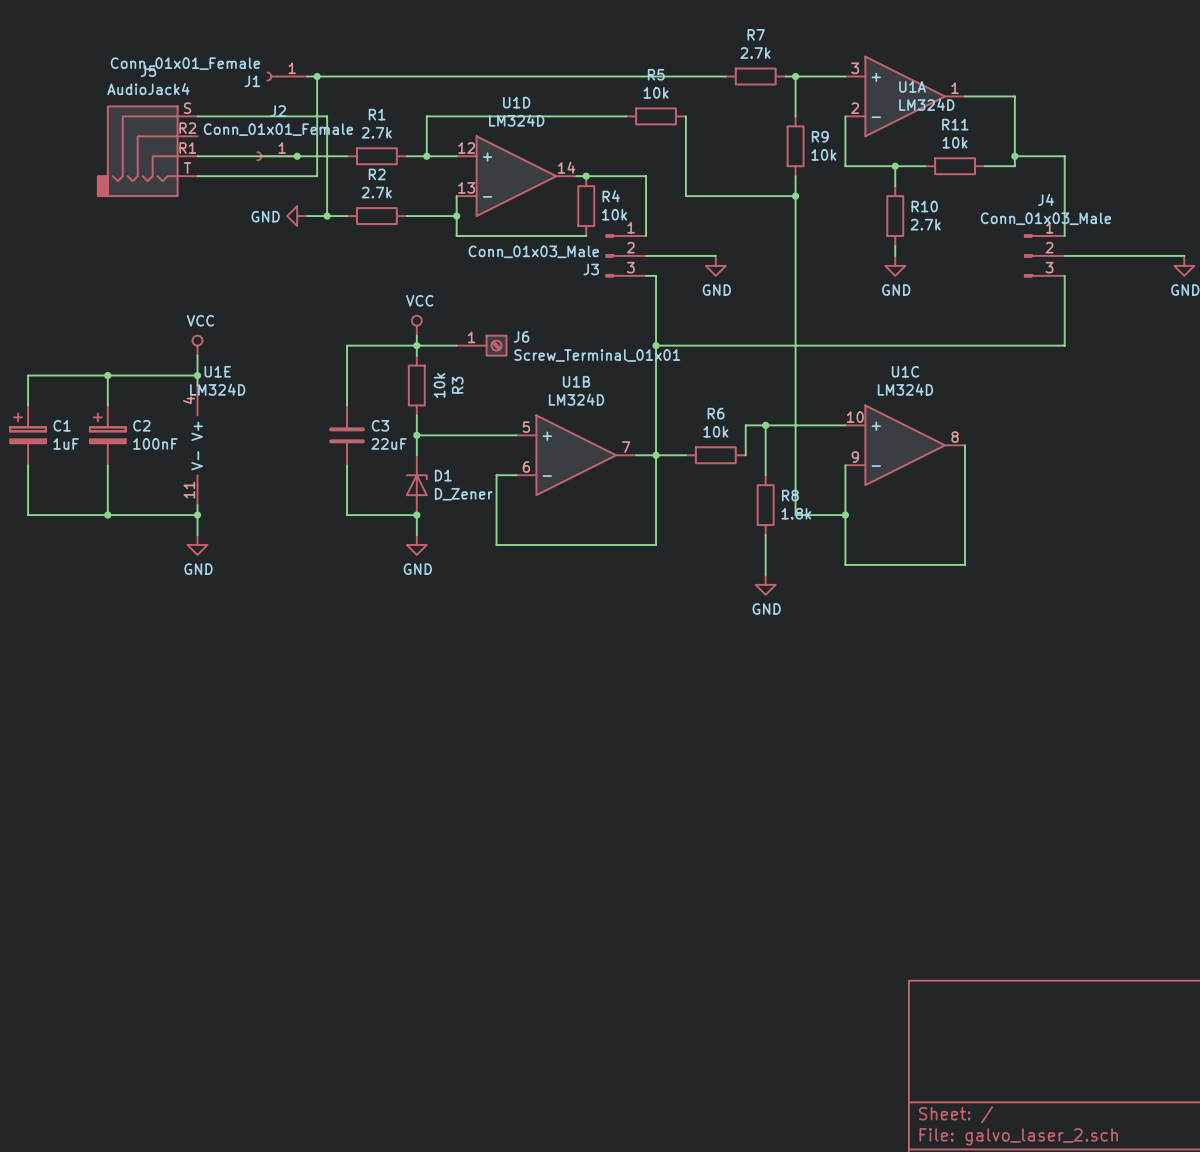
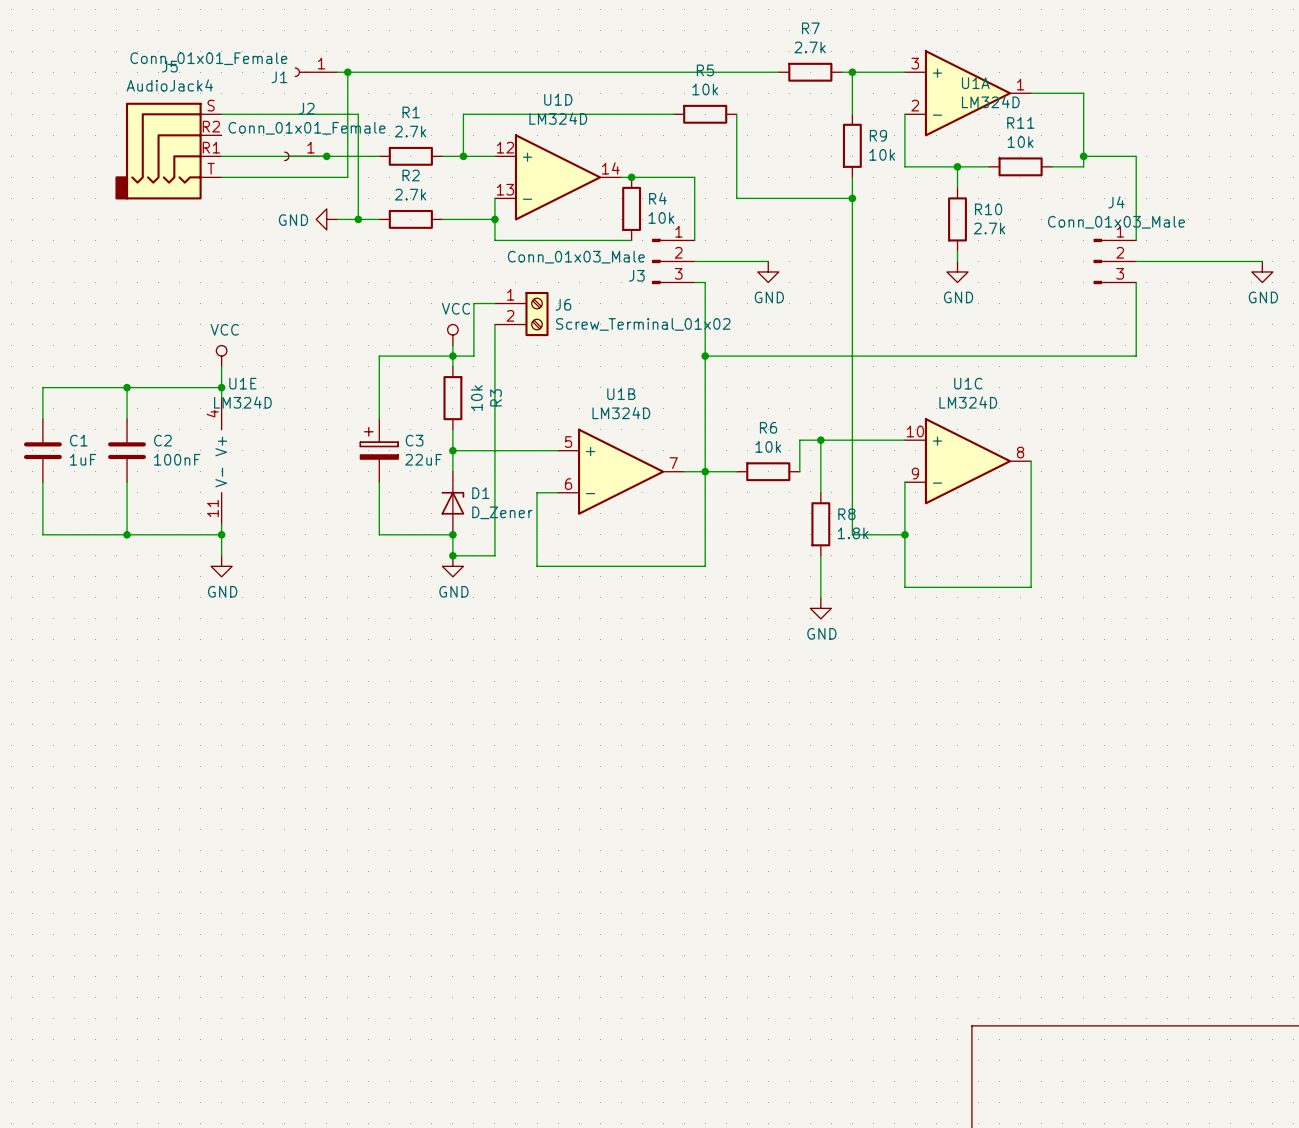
wire: none -> (494, 324) (494, 555) (452, 555)
J6 symbol: [456, 334, 508, 357] -> [494, 291, 549, 337]
wire: (436, 345) (456, 345) -> (473, 356) (473, 303) (494, 303)
J6 value: Screw_Terminal_01x01 (597, 355) -> Screw_Terminal_01x02 (643, 324)
C1 symbol: [10, 405, 47, 466] -> [23, 419, 62, 483]
C2 symbol: [89, 405, 126, 466] -> [108, 419, 146, 483]
C3 symbol: [329, 405, 365, 466] -> [360, 419, 399, 483]
junction: none -> (452, 555)

